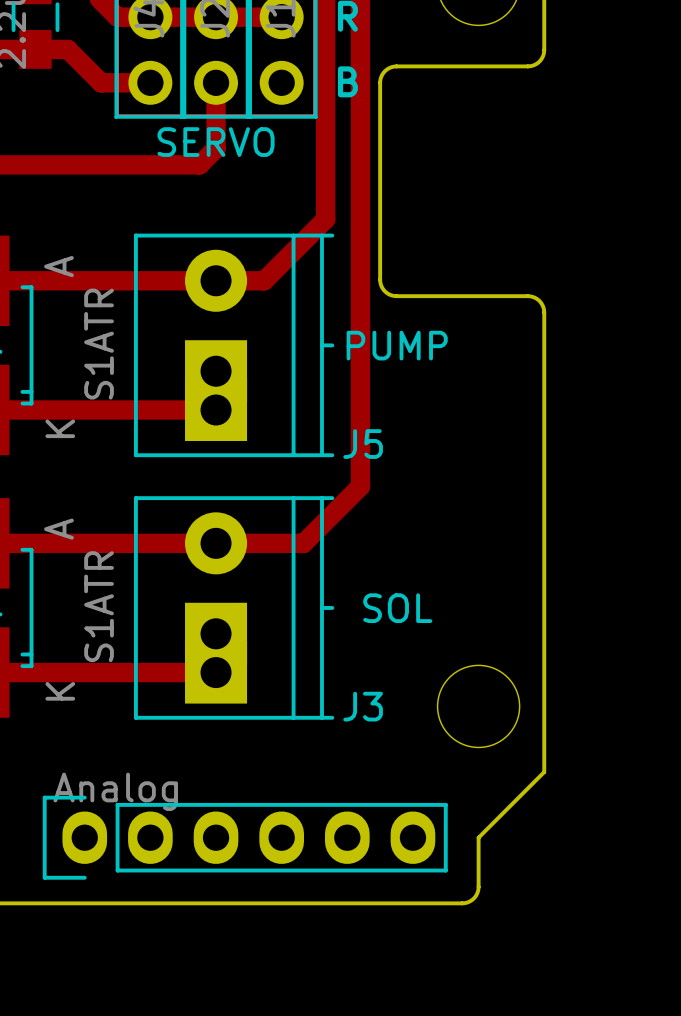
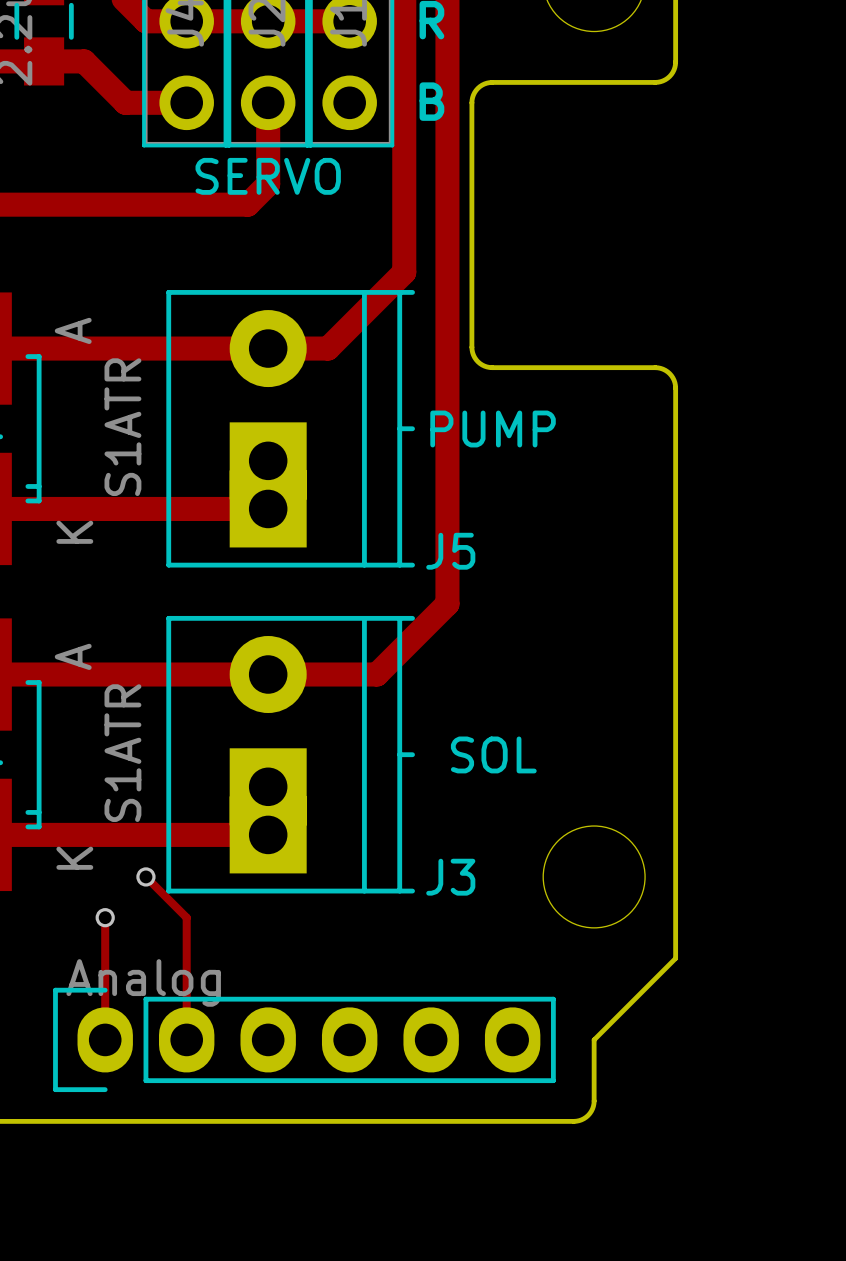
track: none -> (145, 876) (186, 917) (186, 1039)
via: none -> (145, 876)
track: none -> (105, 917) (105, 1039)
via: none -> (105, 917)

